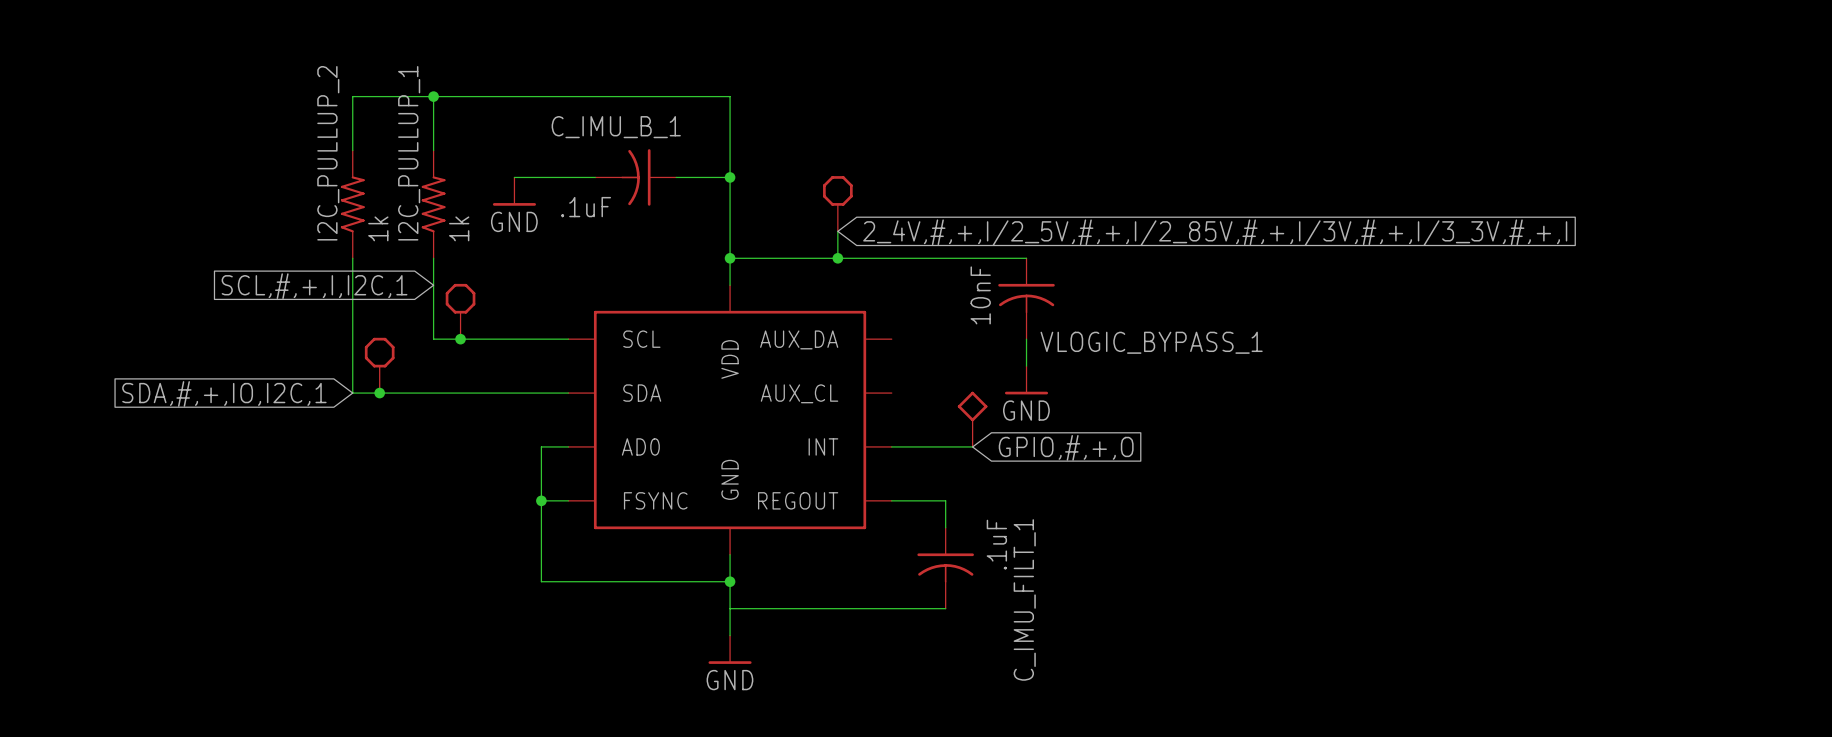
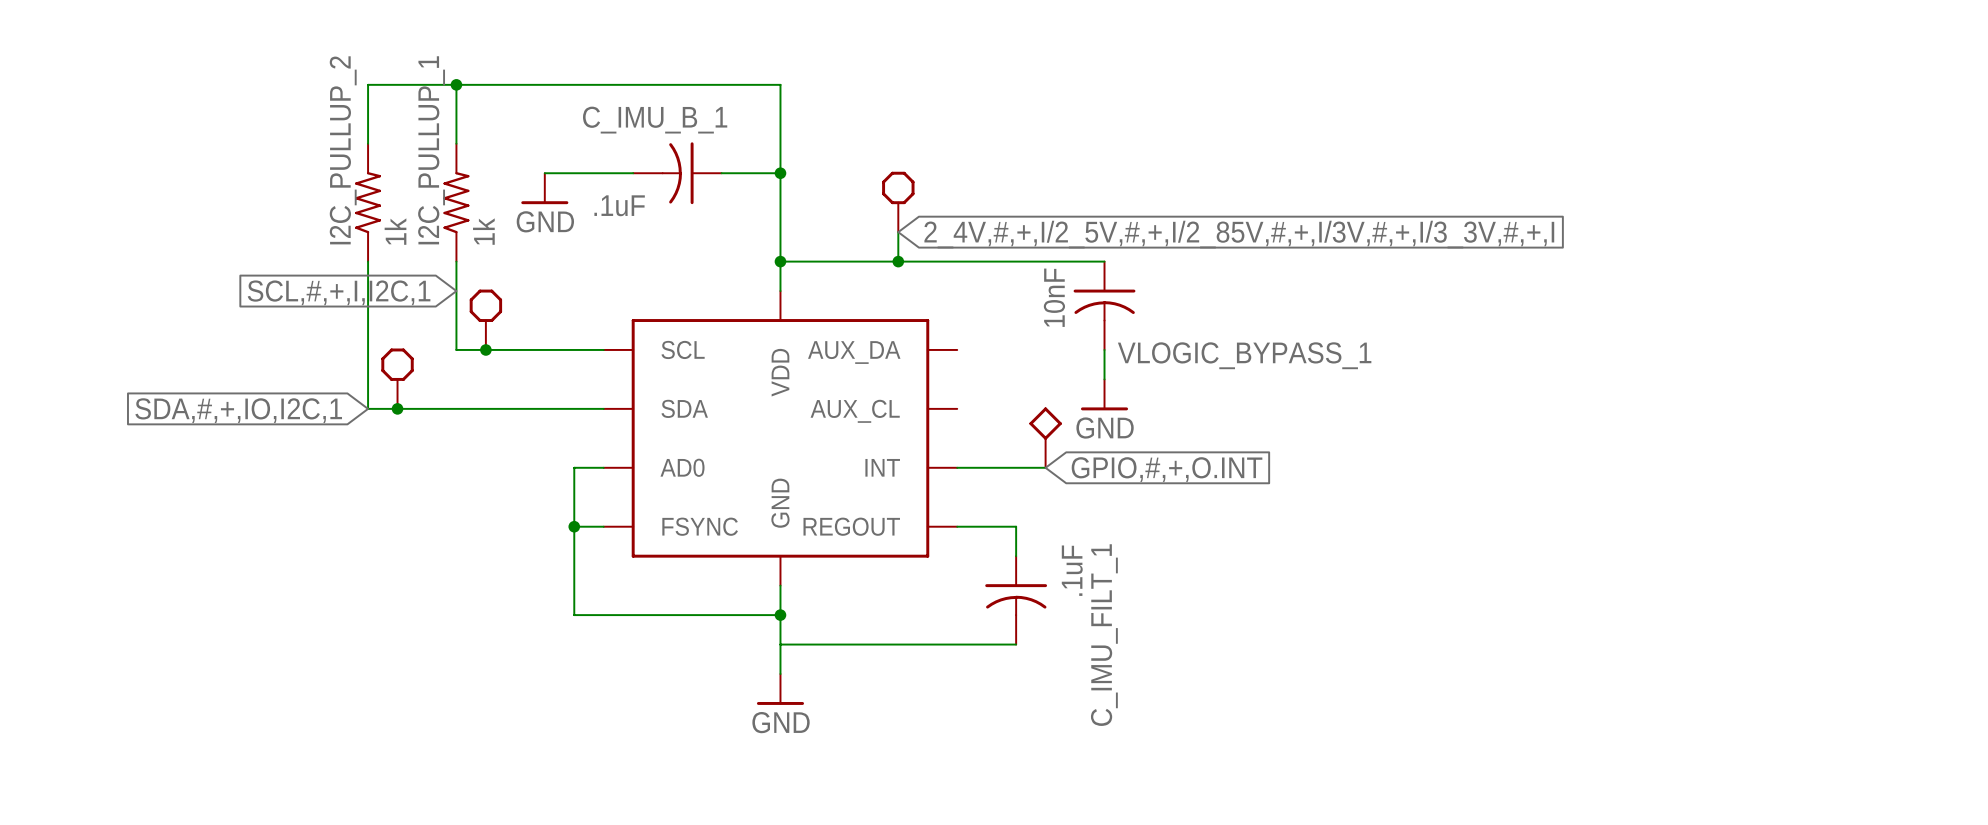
global label: GPIO,#,+,O (1066, 447) -> GPIO,#,+,O.INT (1167, 469)

